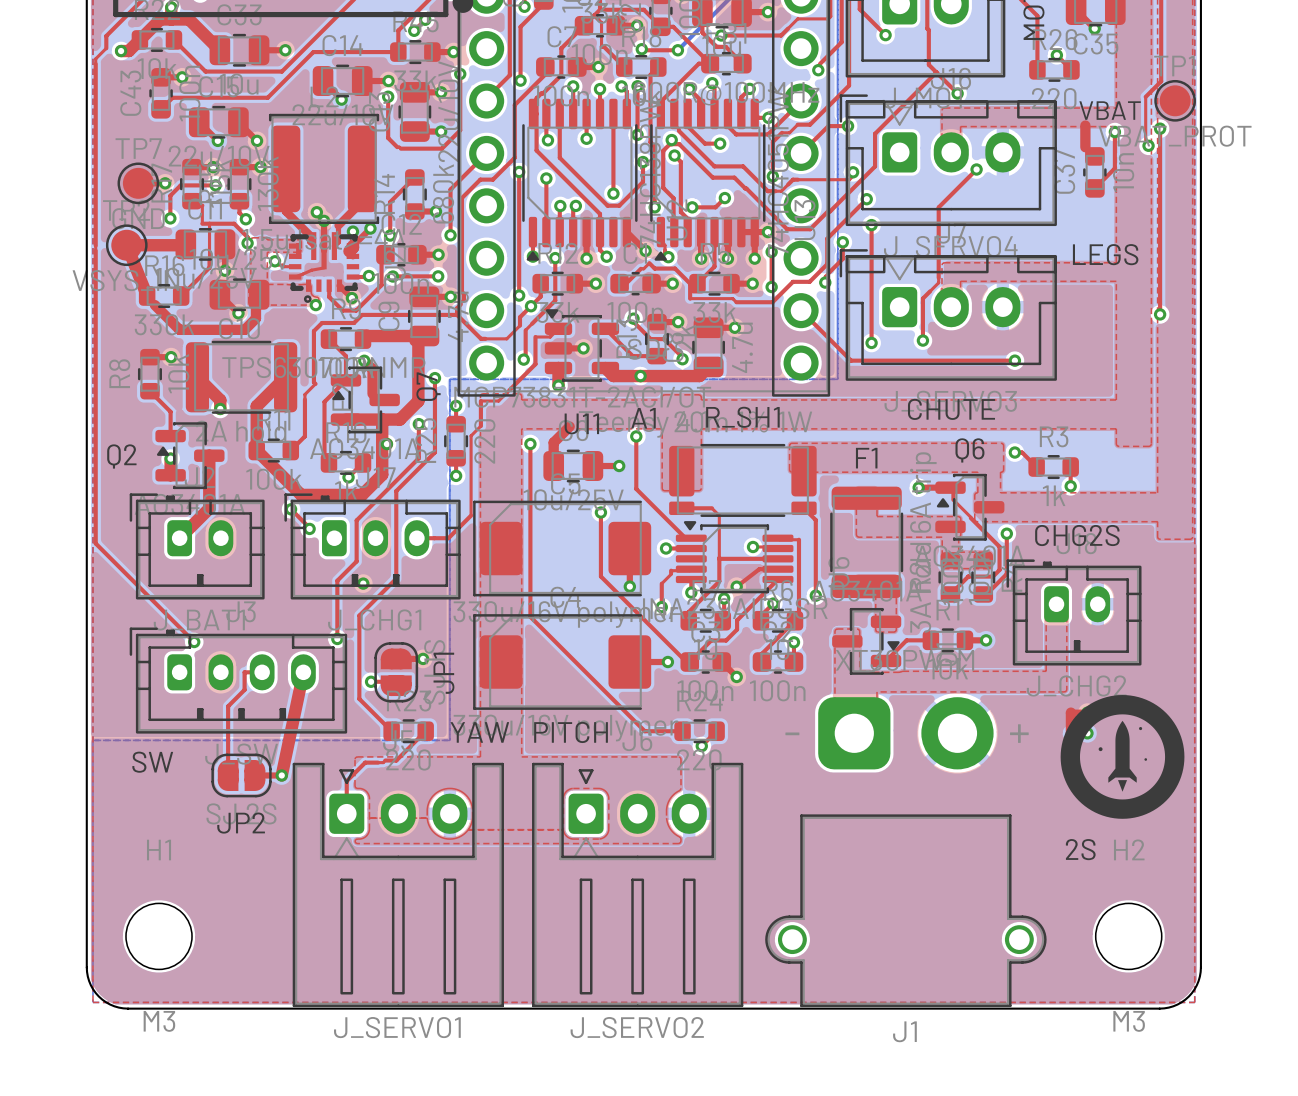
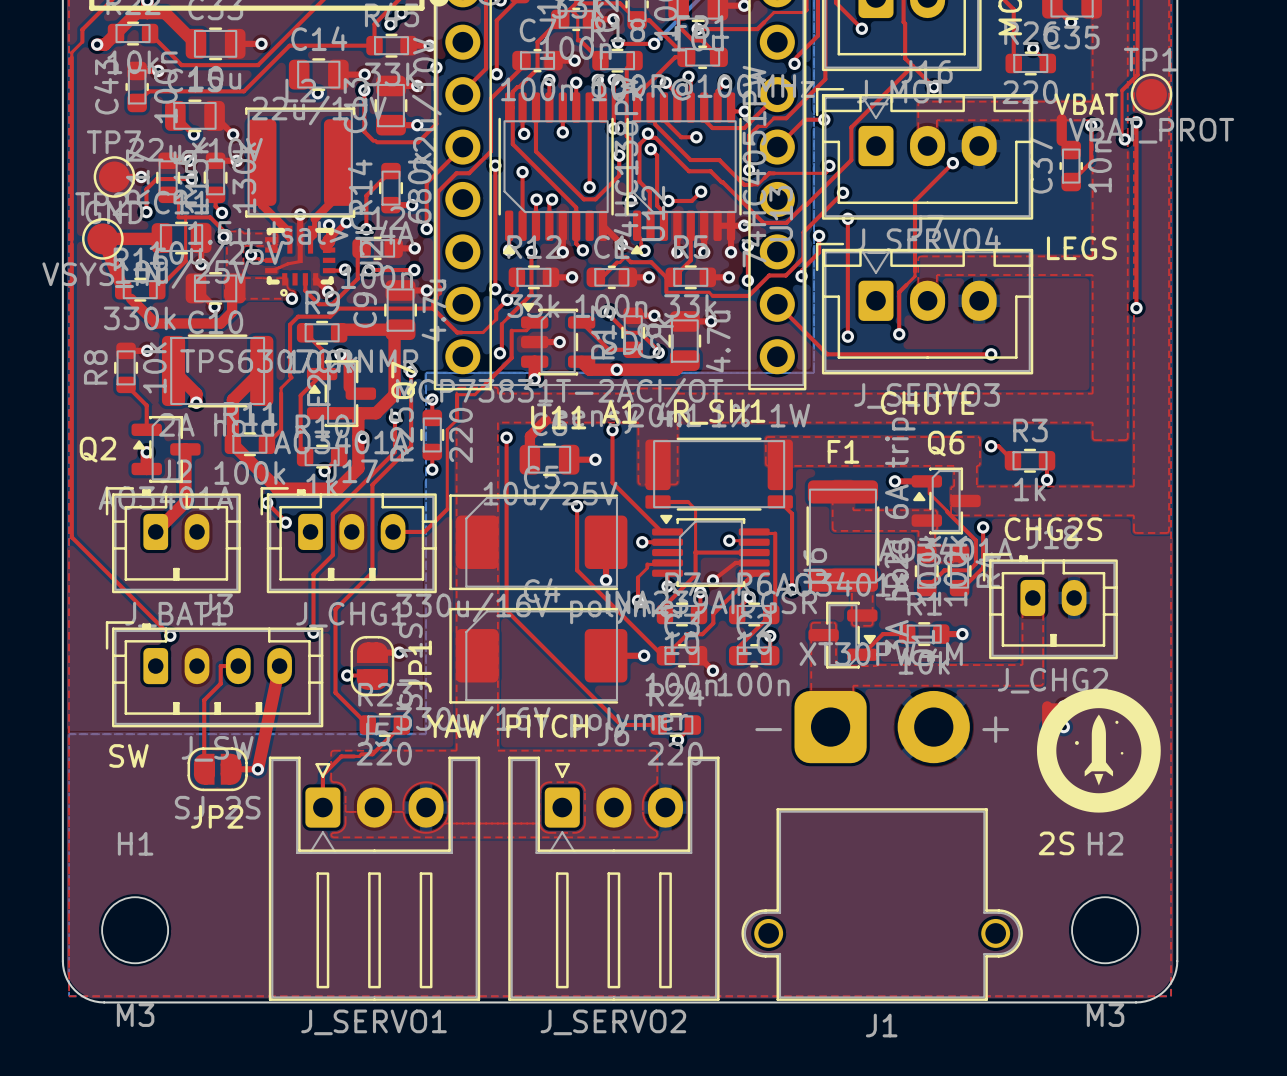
via: (316, 212) -> none
via: (363, 583) -> none

